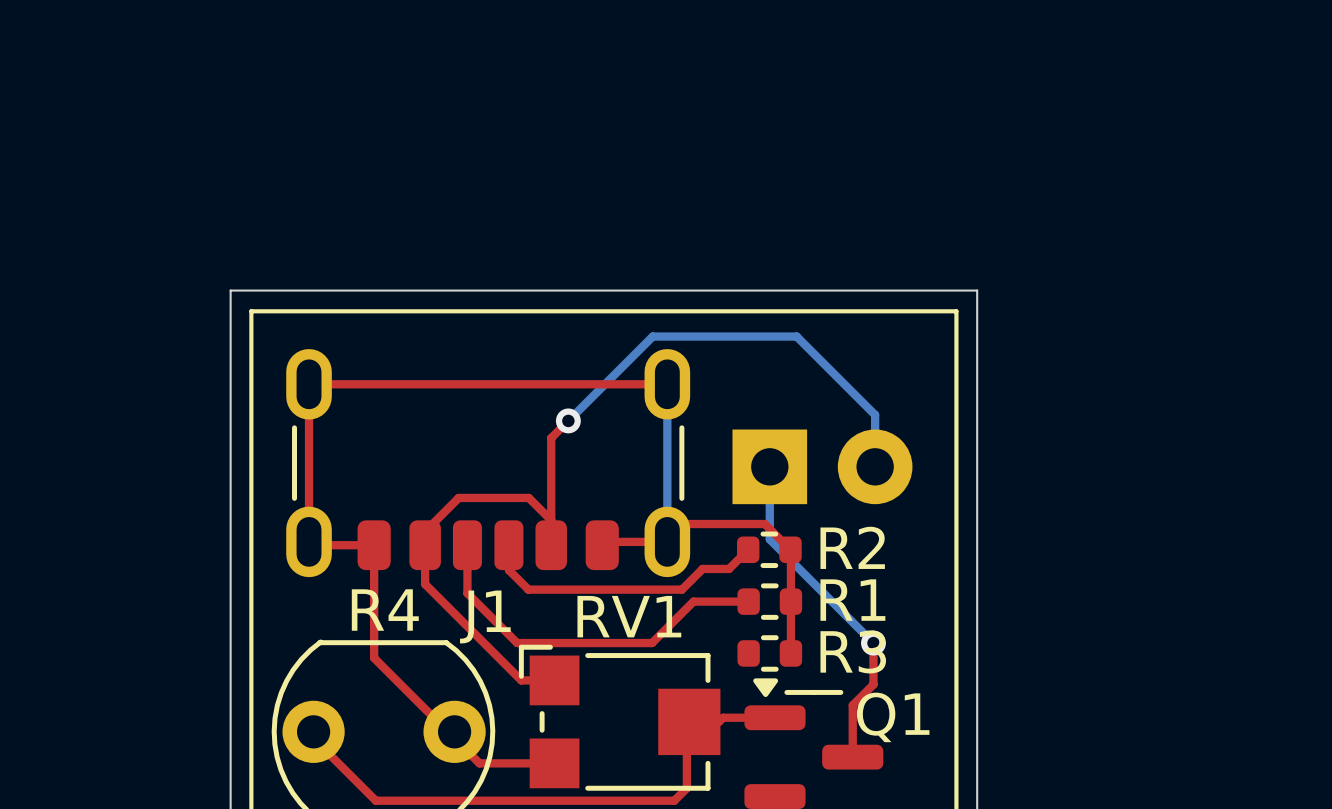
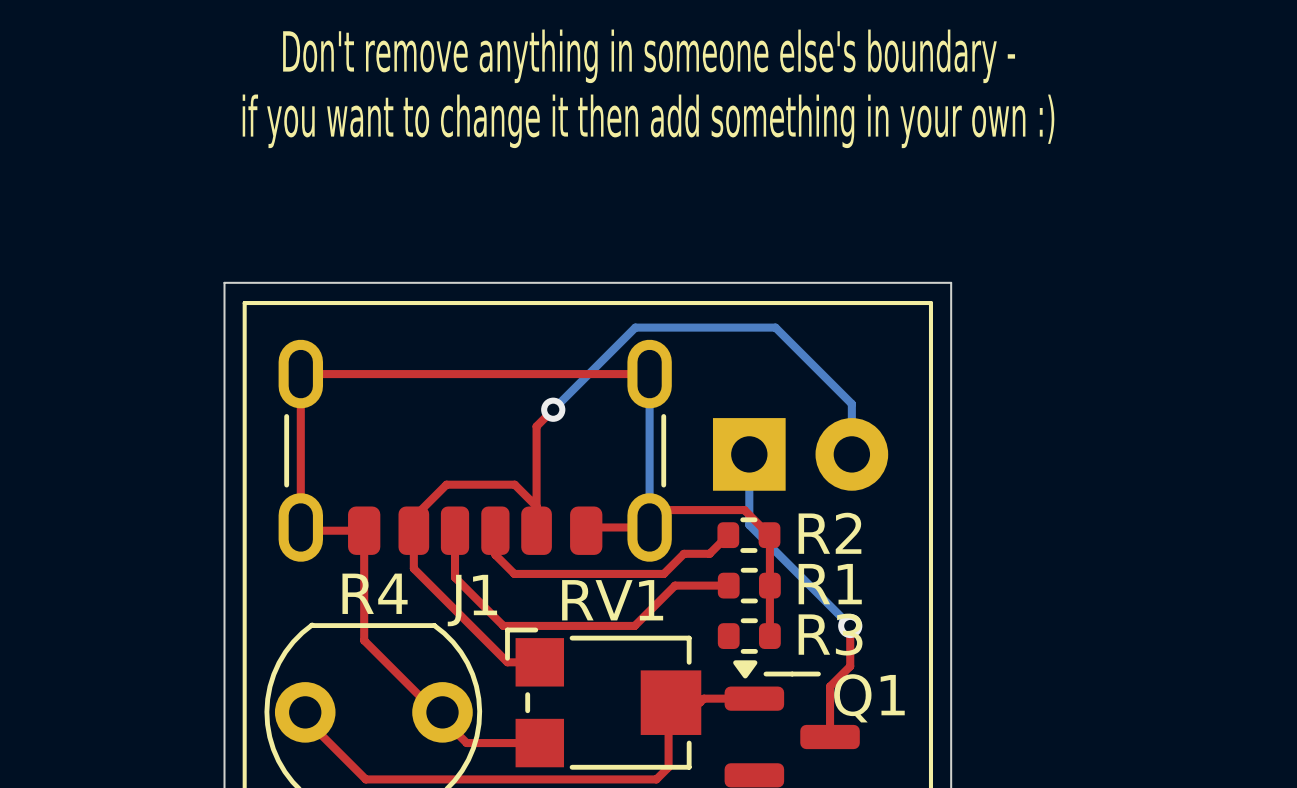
text: none -> Don't remove anything in someone else's boundary - (649, 56)
text: none -> if you want to change it then add something in your own :) (648, 121)

